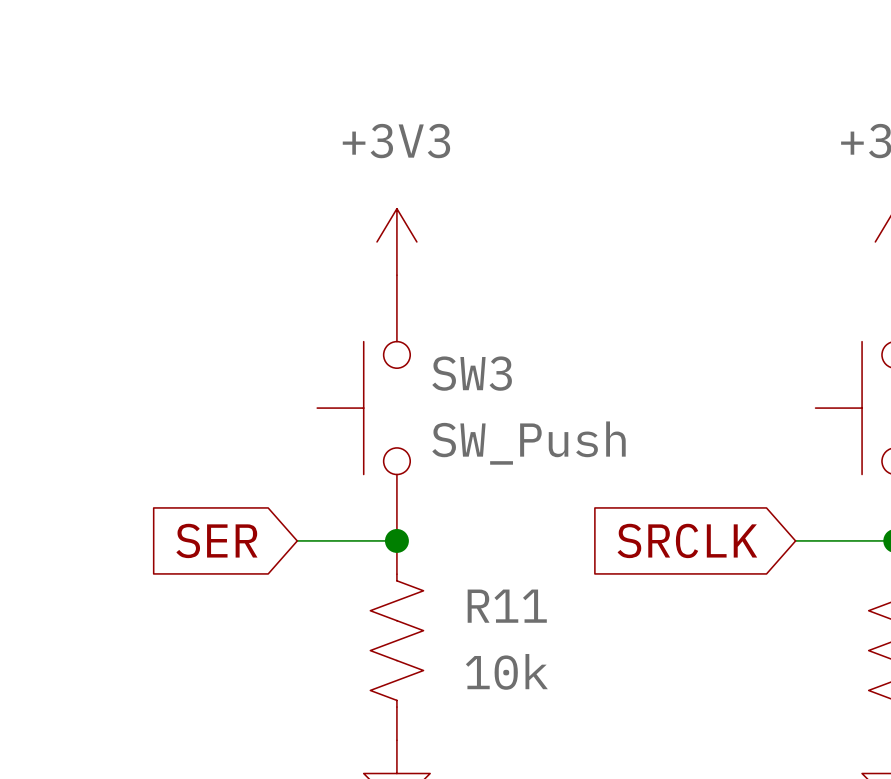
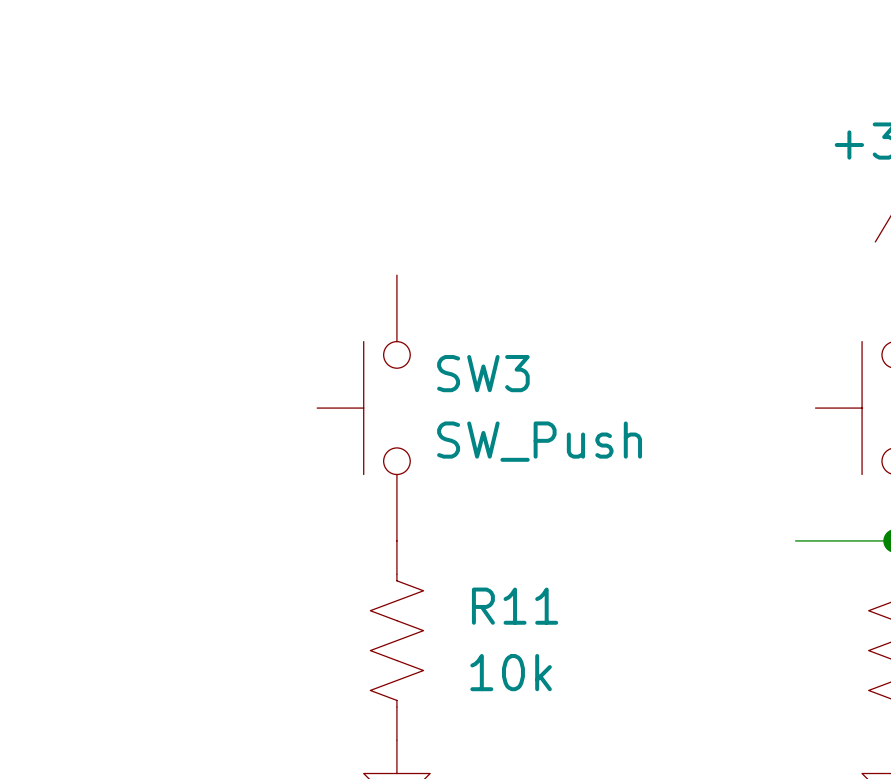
power symbol: +3V3 (396, 241) -> none
global label: SER (216, 540) -> none
wire: (297, 540) (396, 540) -> none
junction: (396, 540) -> none
global label: SRCLK (687, 540) -> none

